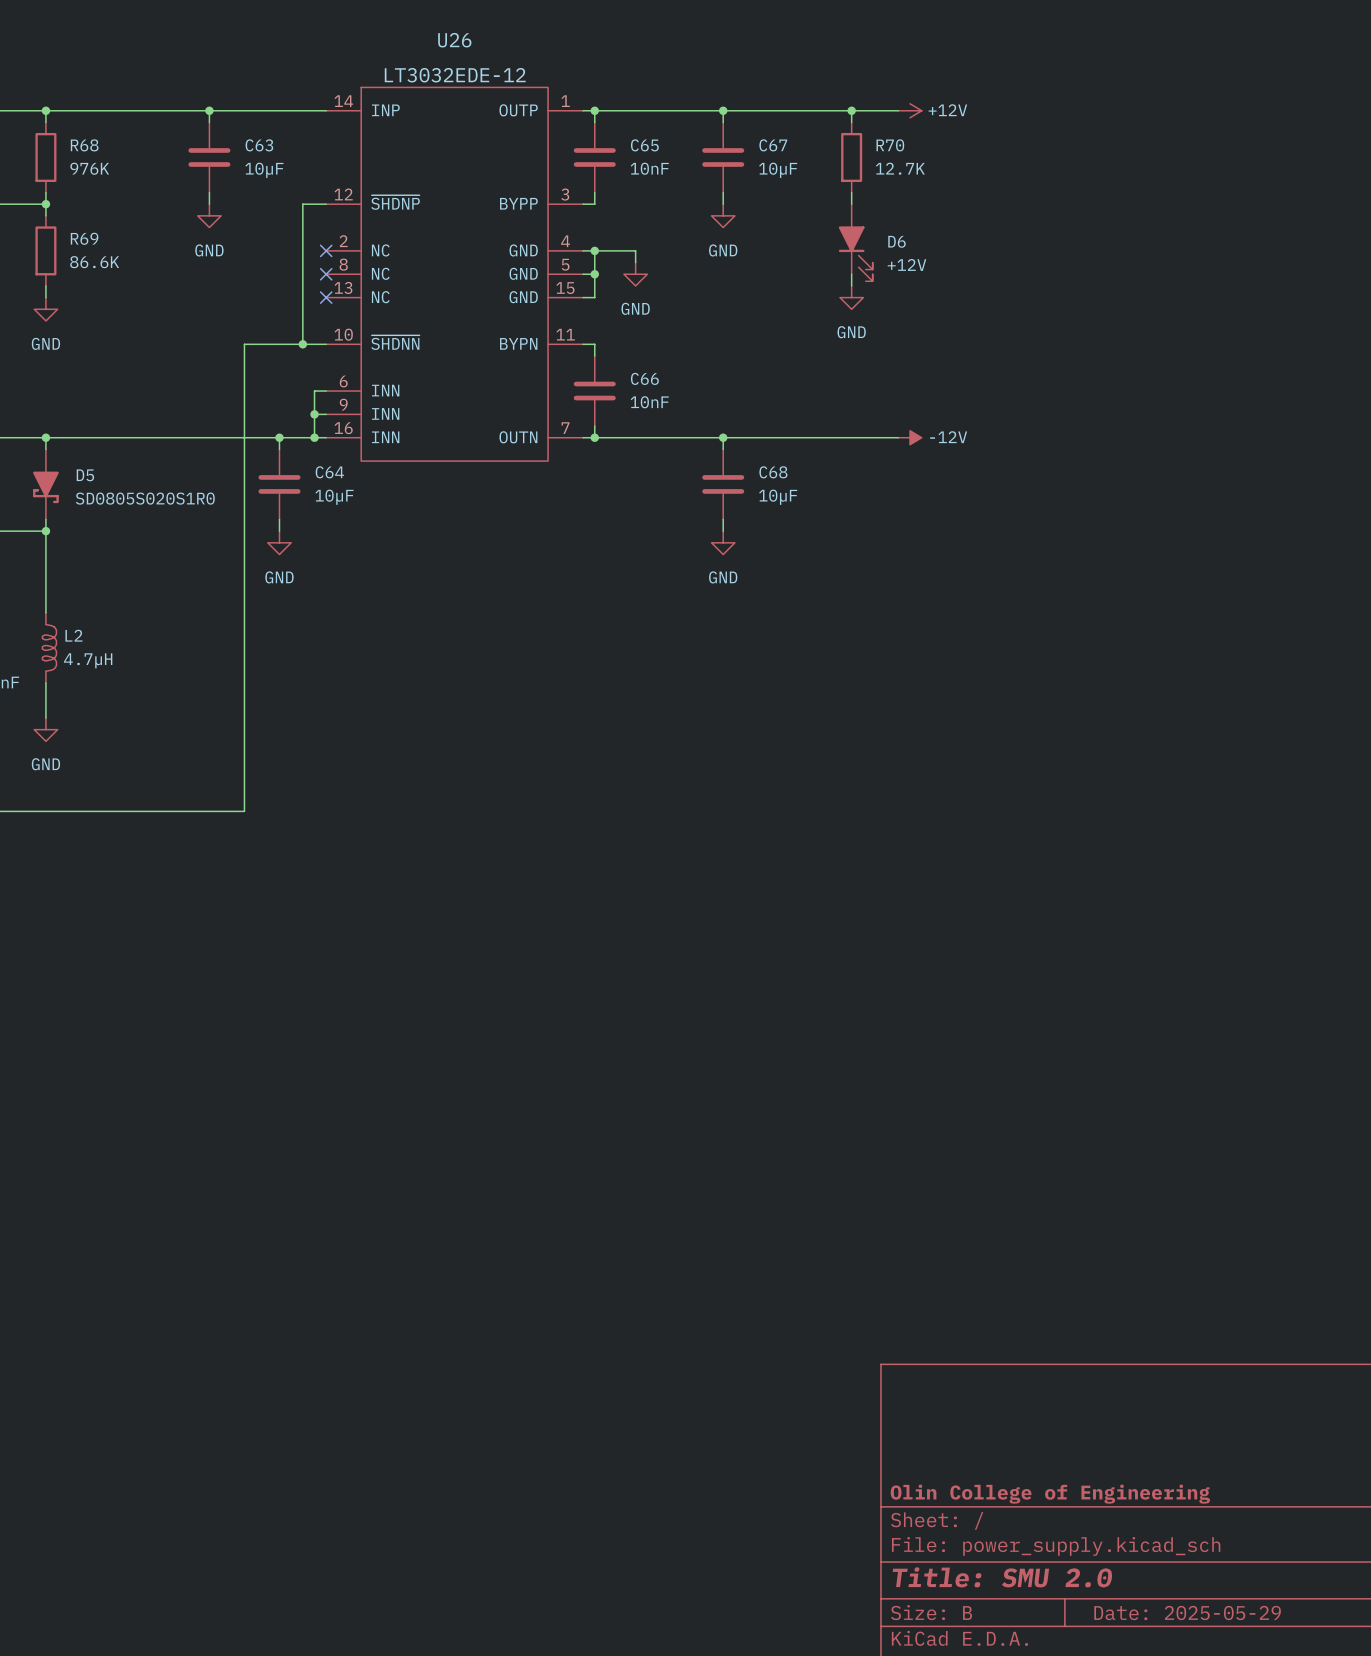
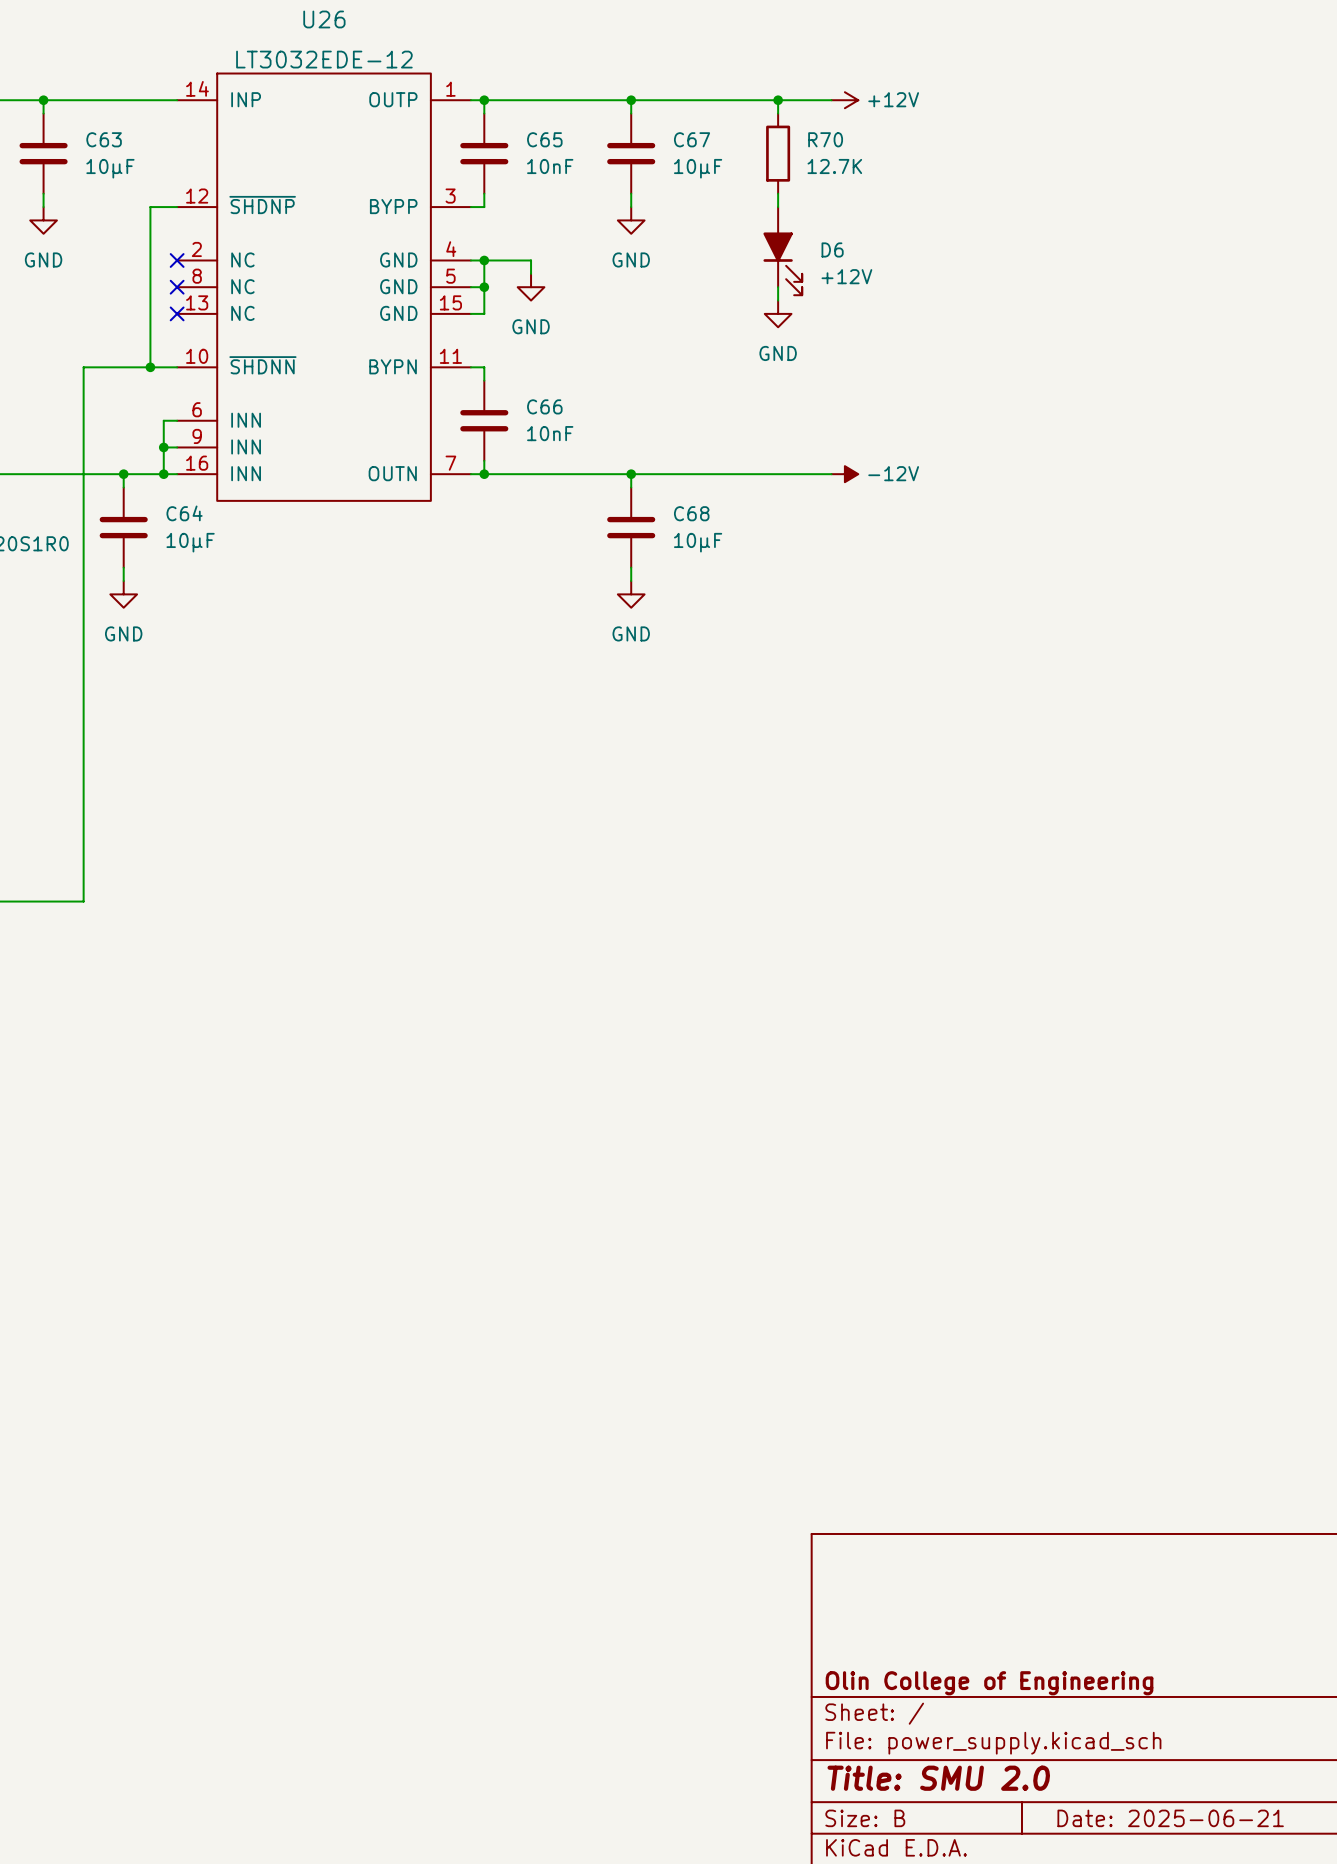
title block: Date: 2025-05-29 (1187, 1613) -> Date: 2025-06-21 (1170, 1818)

